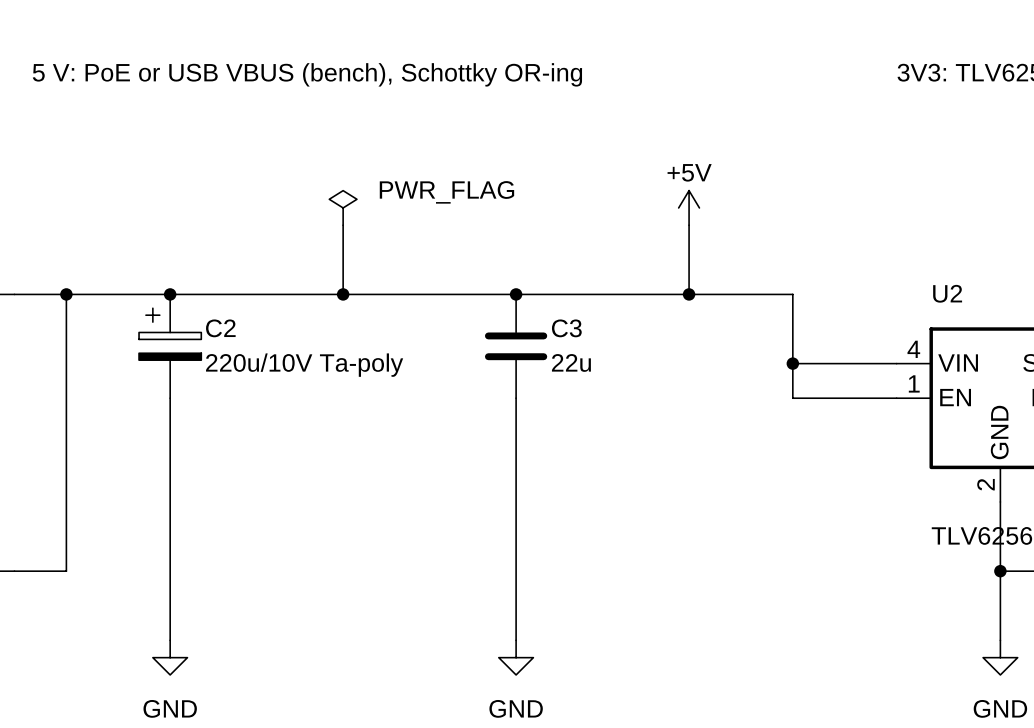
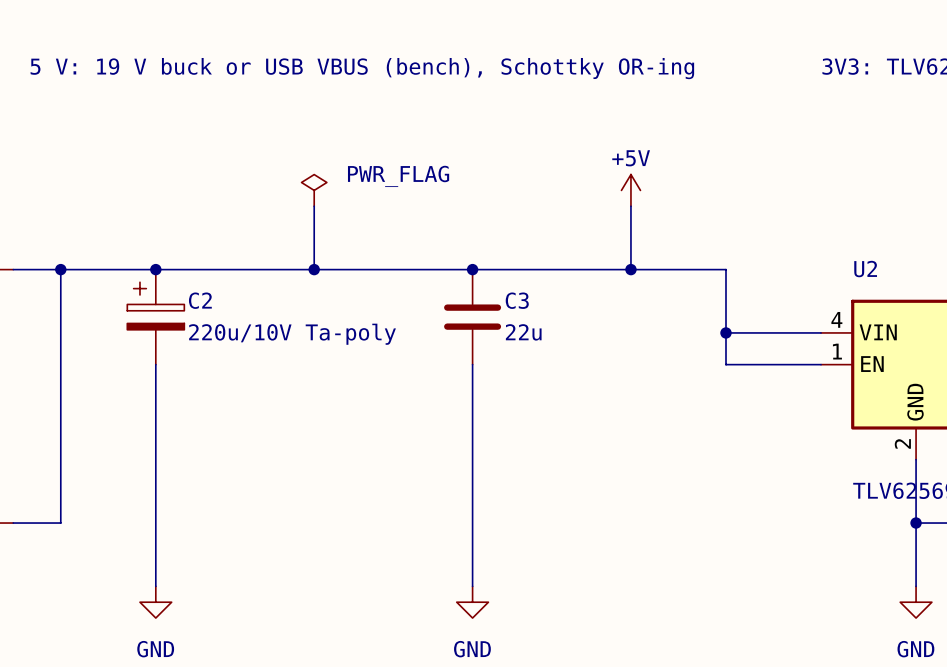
text: 5 V: PoE or USB VBUS (bench), Schottky OR-ing (307, 74) -> 5 V: 19 V buck or USB VBUS (bench), Schottky OR-ing (362, 68)

